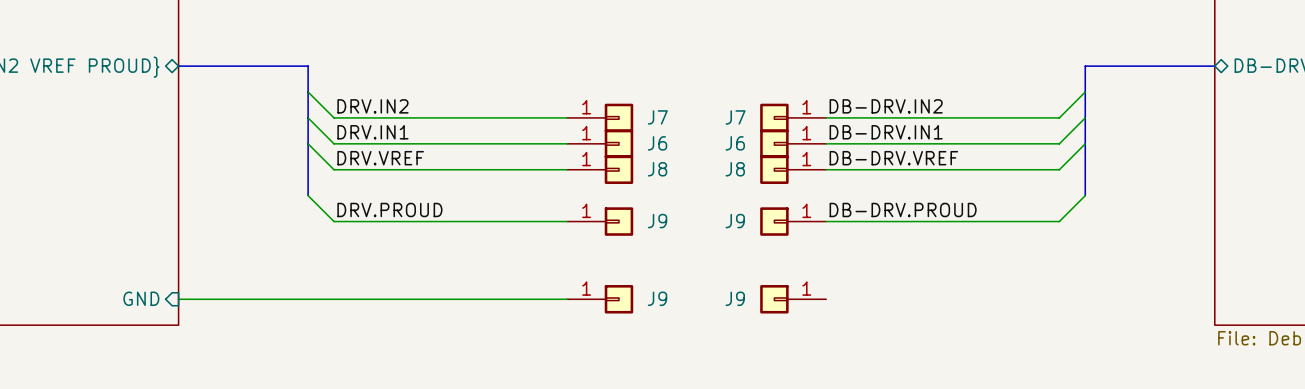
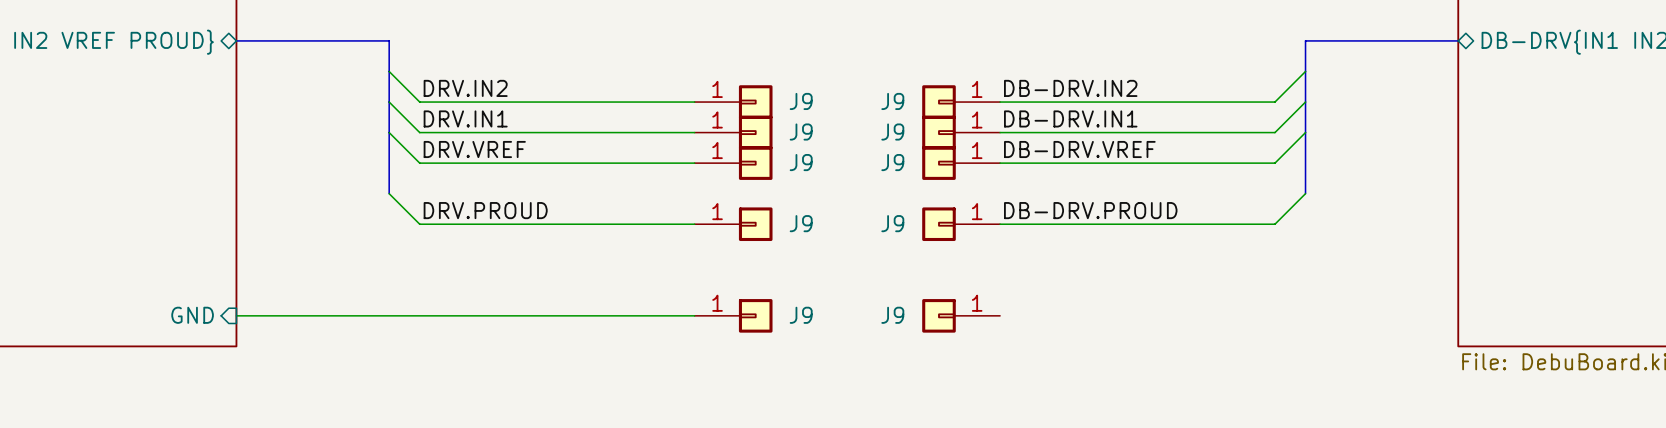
J7 name: J7 (657, 117) -> J9 (801, 101)
J7 name: J7 (735, 117) -> J9 (892, 101)
J6 name: J6 (657, 143) -> J9 (801, 132)
J6 name: J6 (735, 143) -> J9 (892, 132)
J8 name: J8 (657, 169) -> J9 (801, 162)
J8 name: J8 (735, 169) -> J9 (892, 162)

